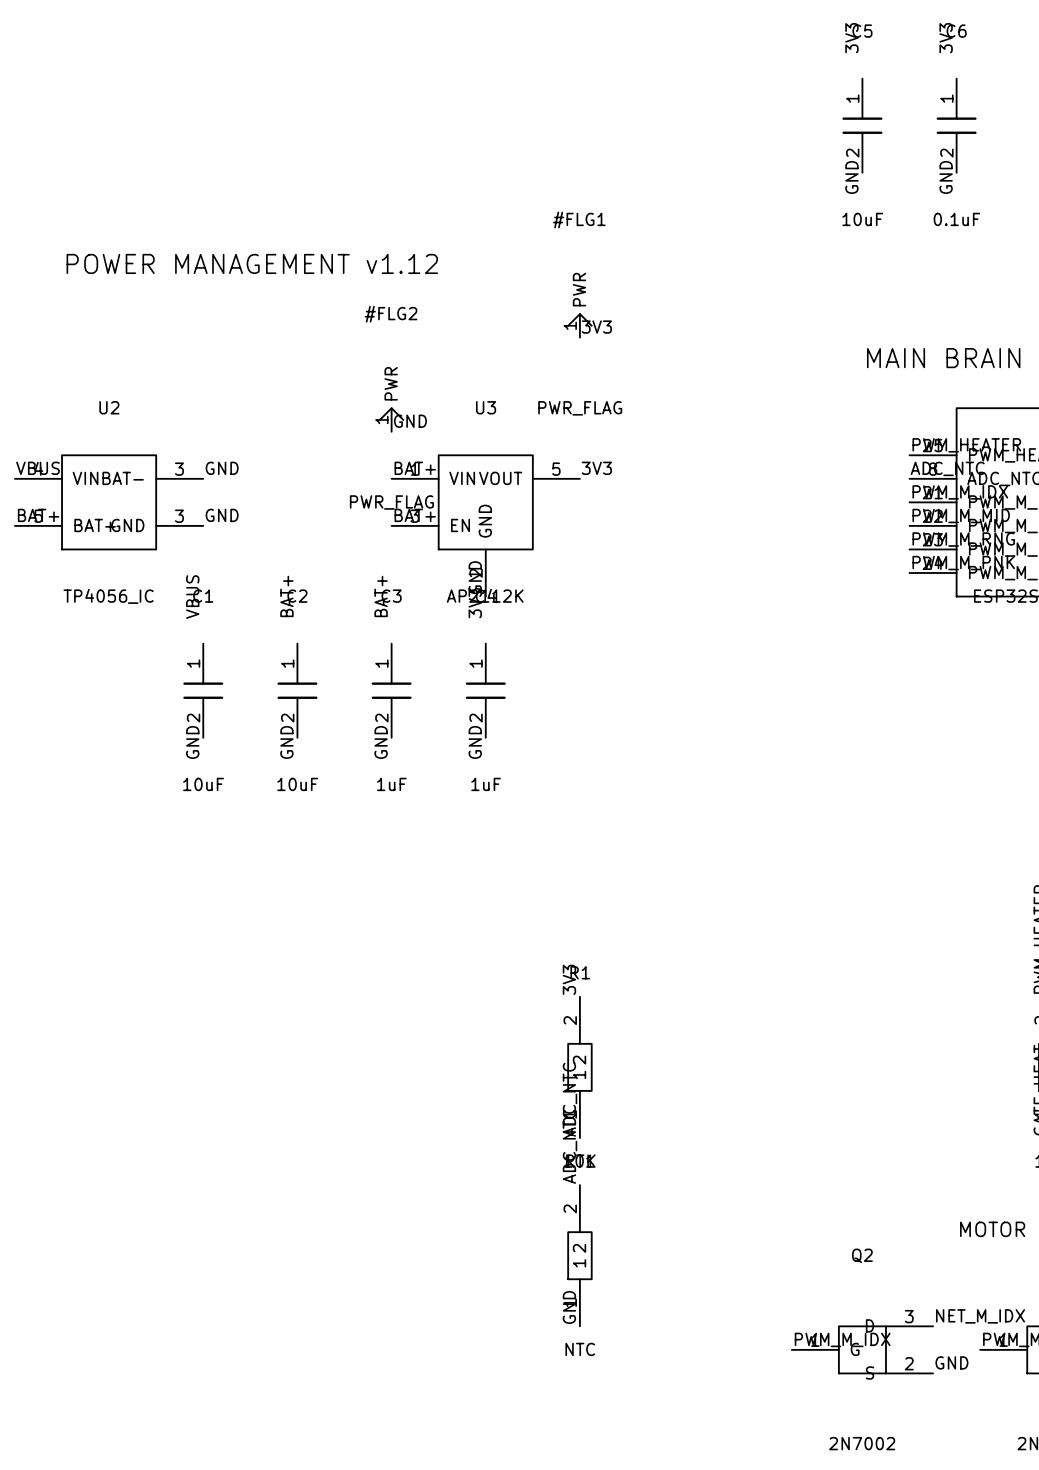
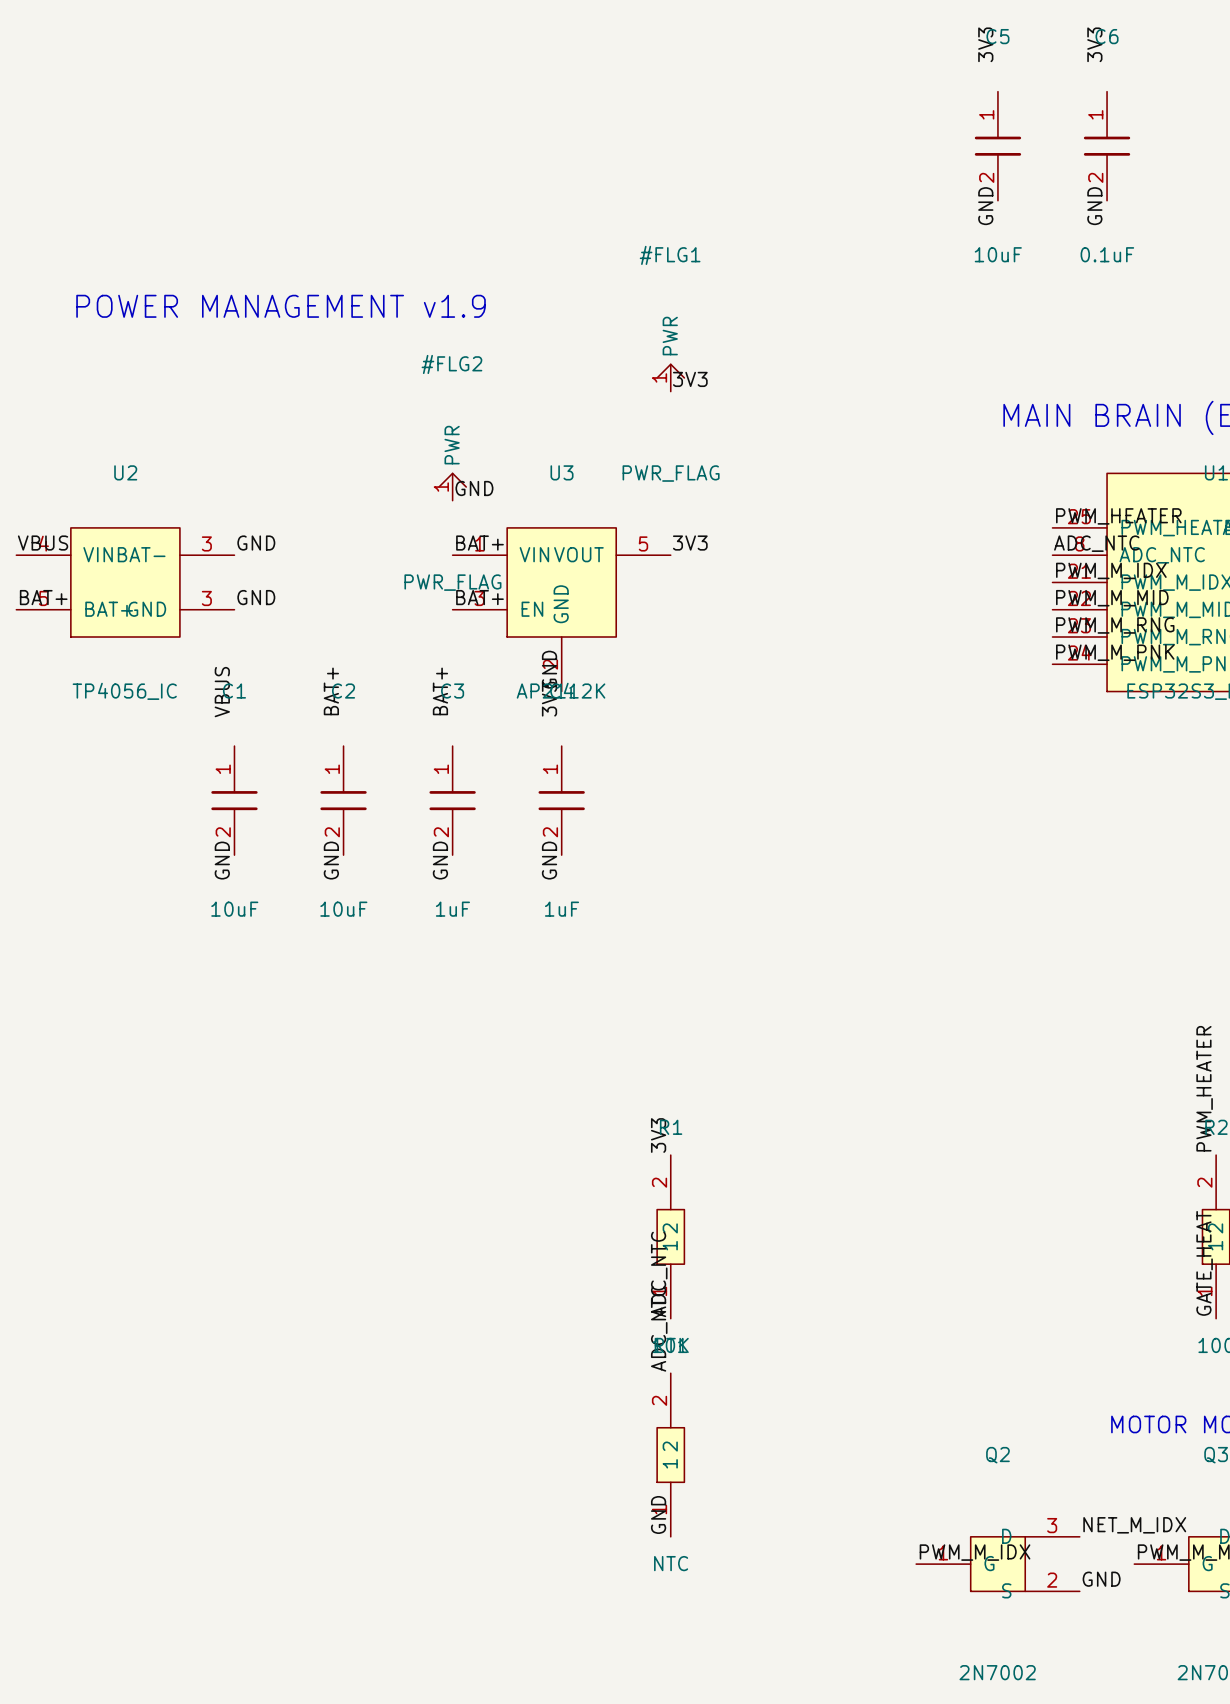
text: POWER MANAGEMENT v1.12 (252, 263) -> POWER MANAGEMENT v1.9 (281, 306)

